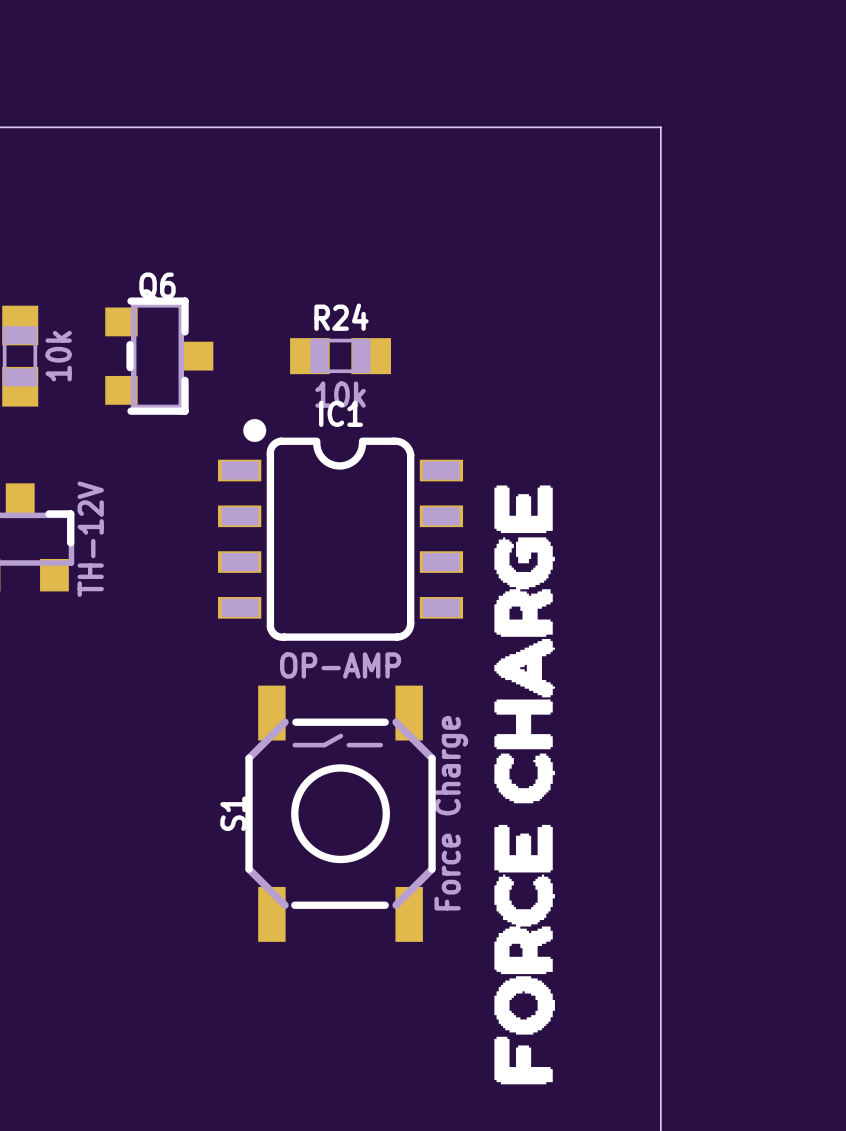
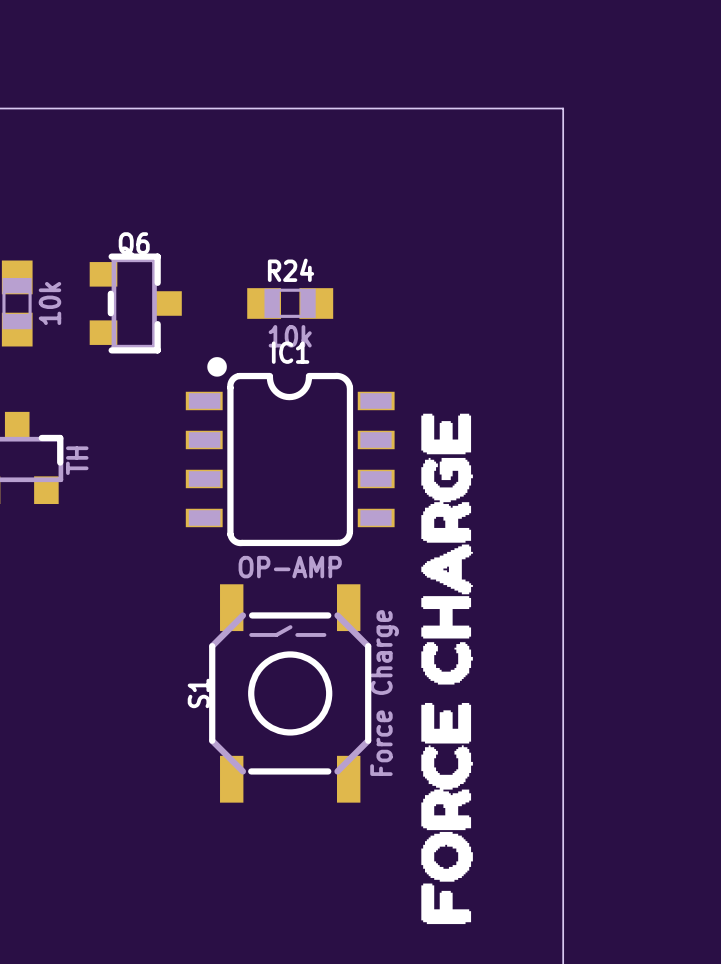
part value: TH-12V (90, 539) -> TH (77, 460)

